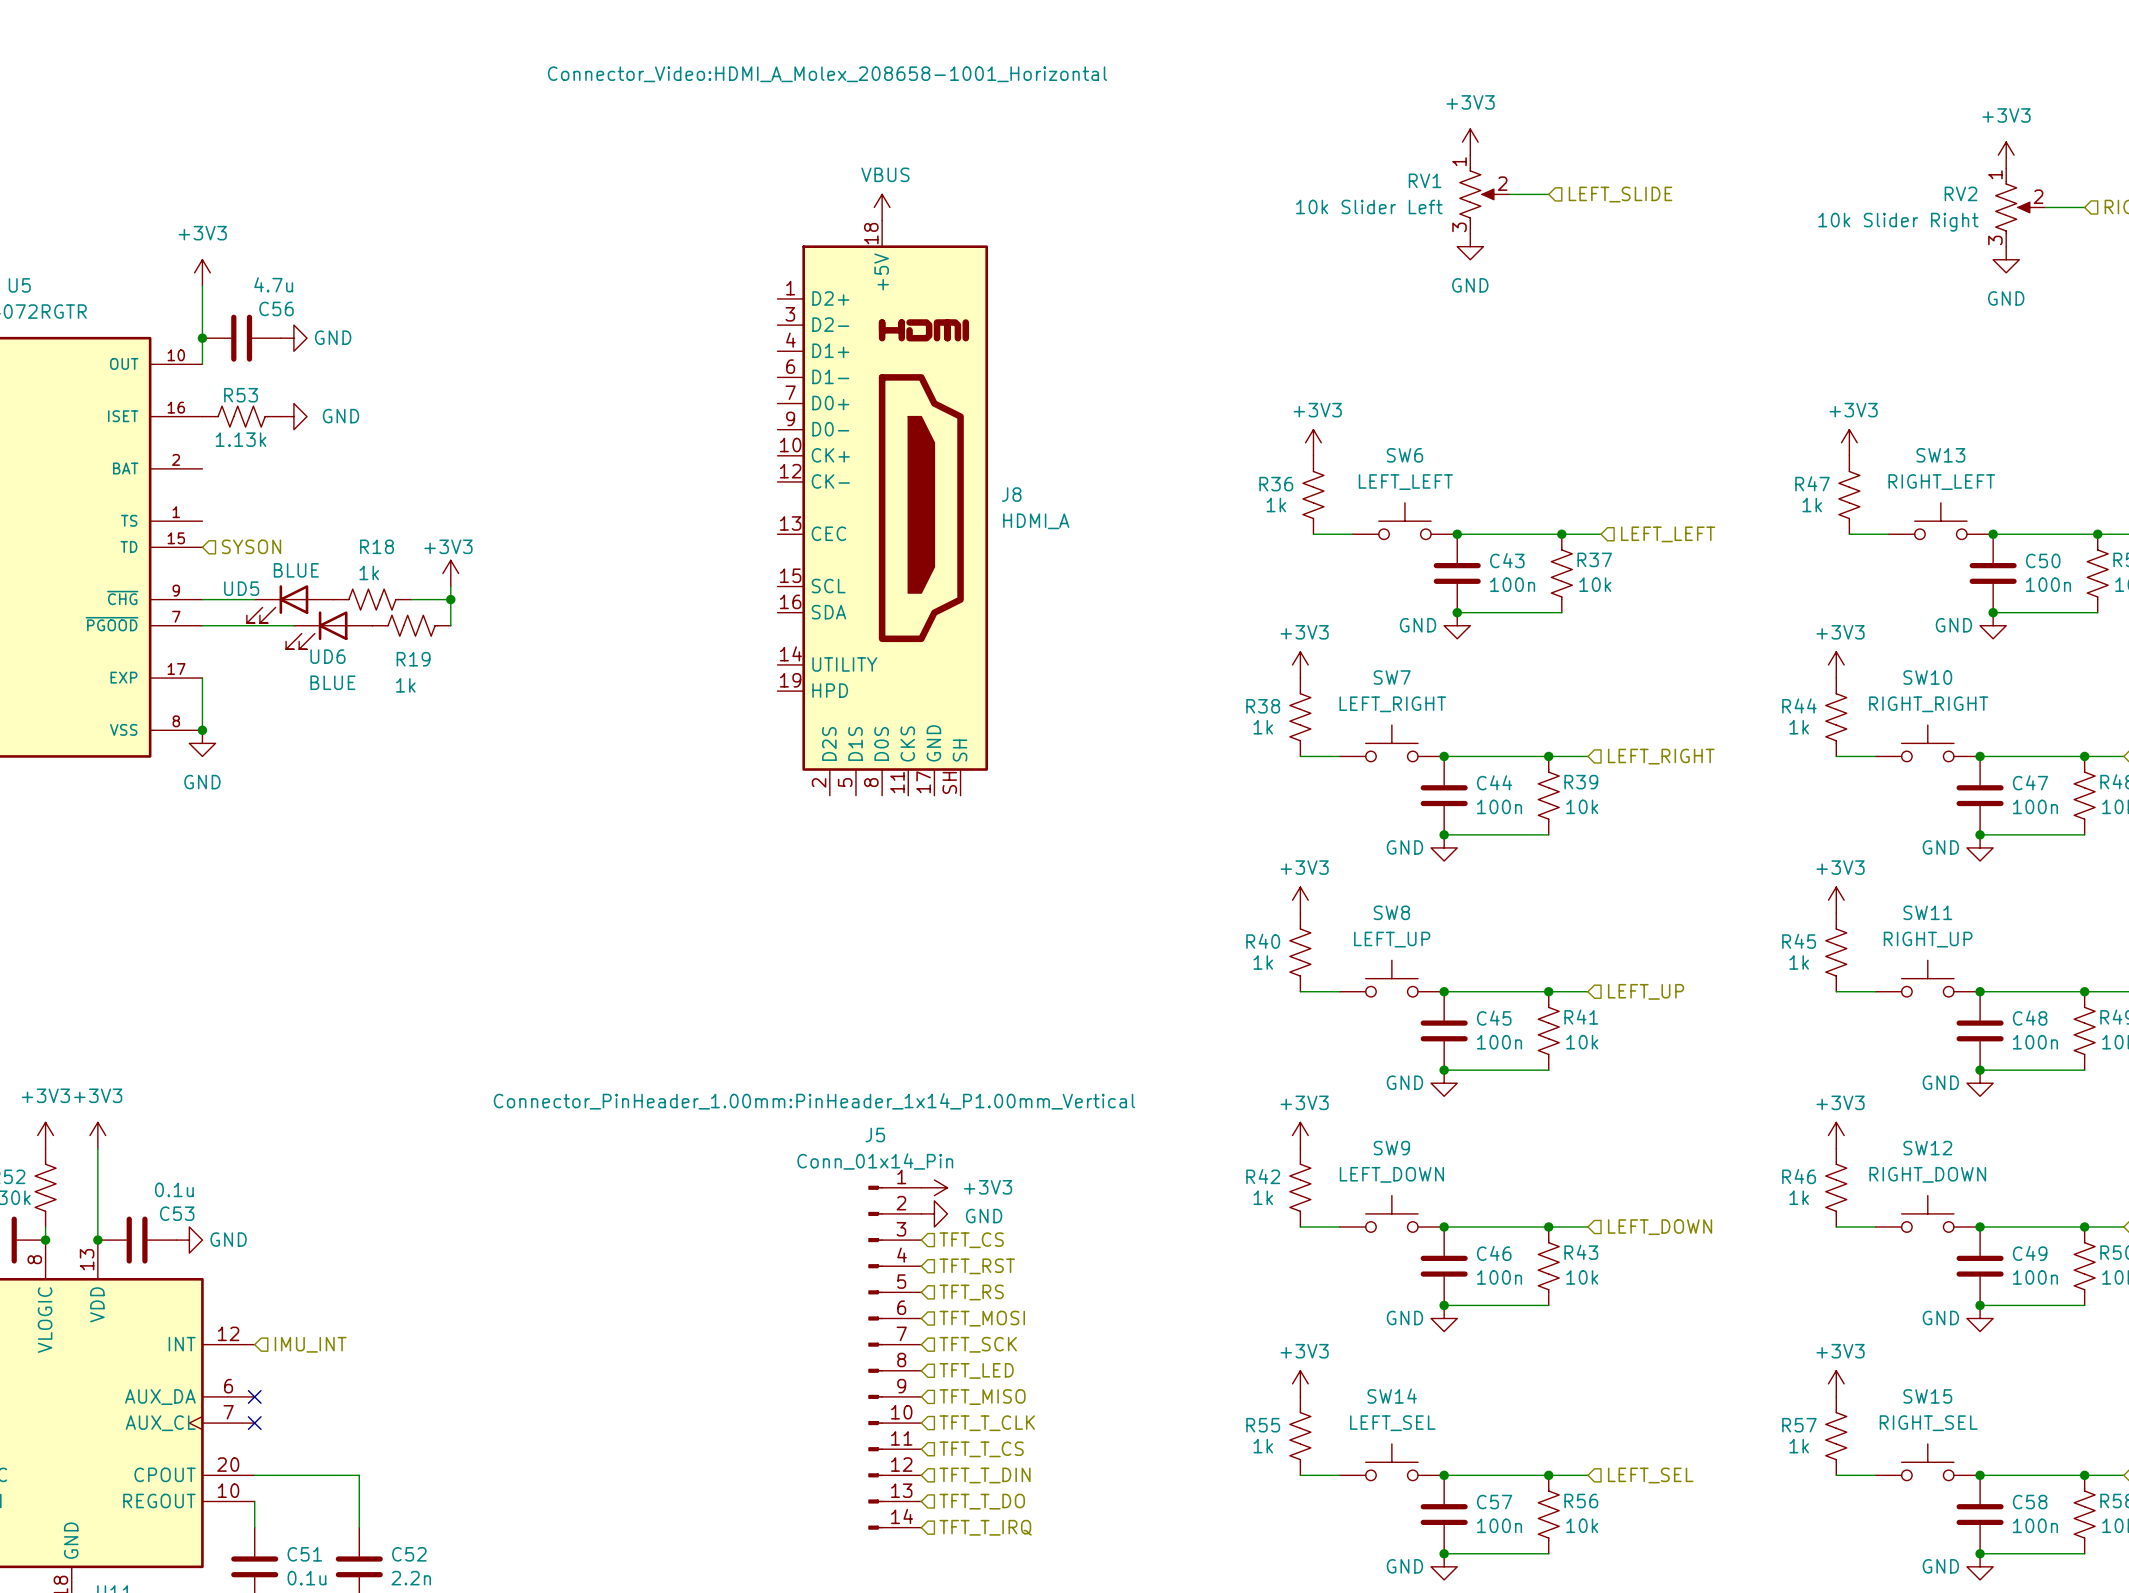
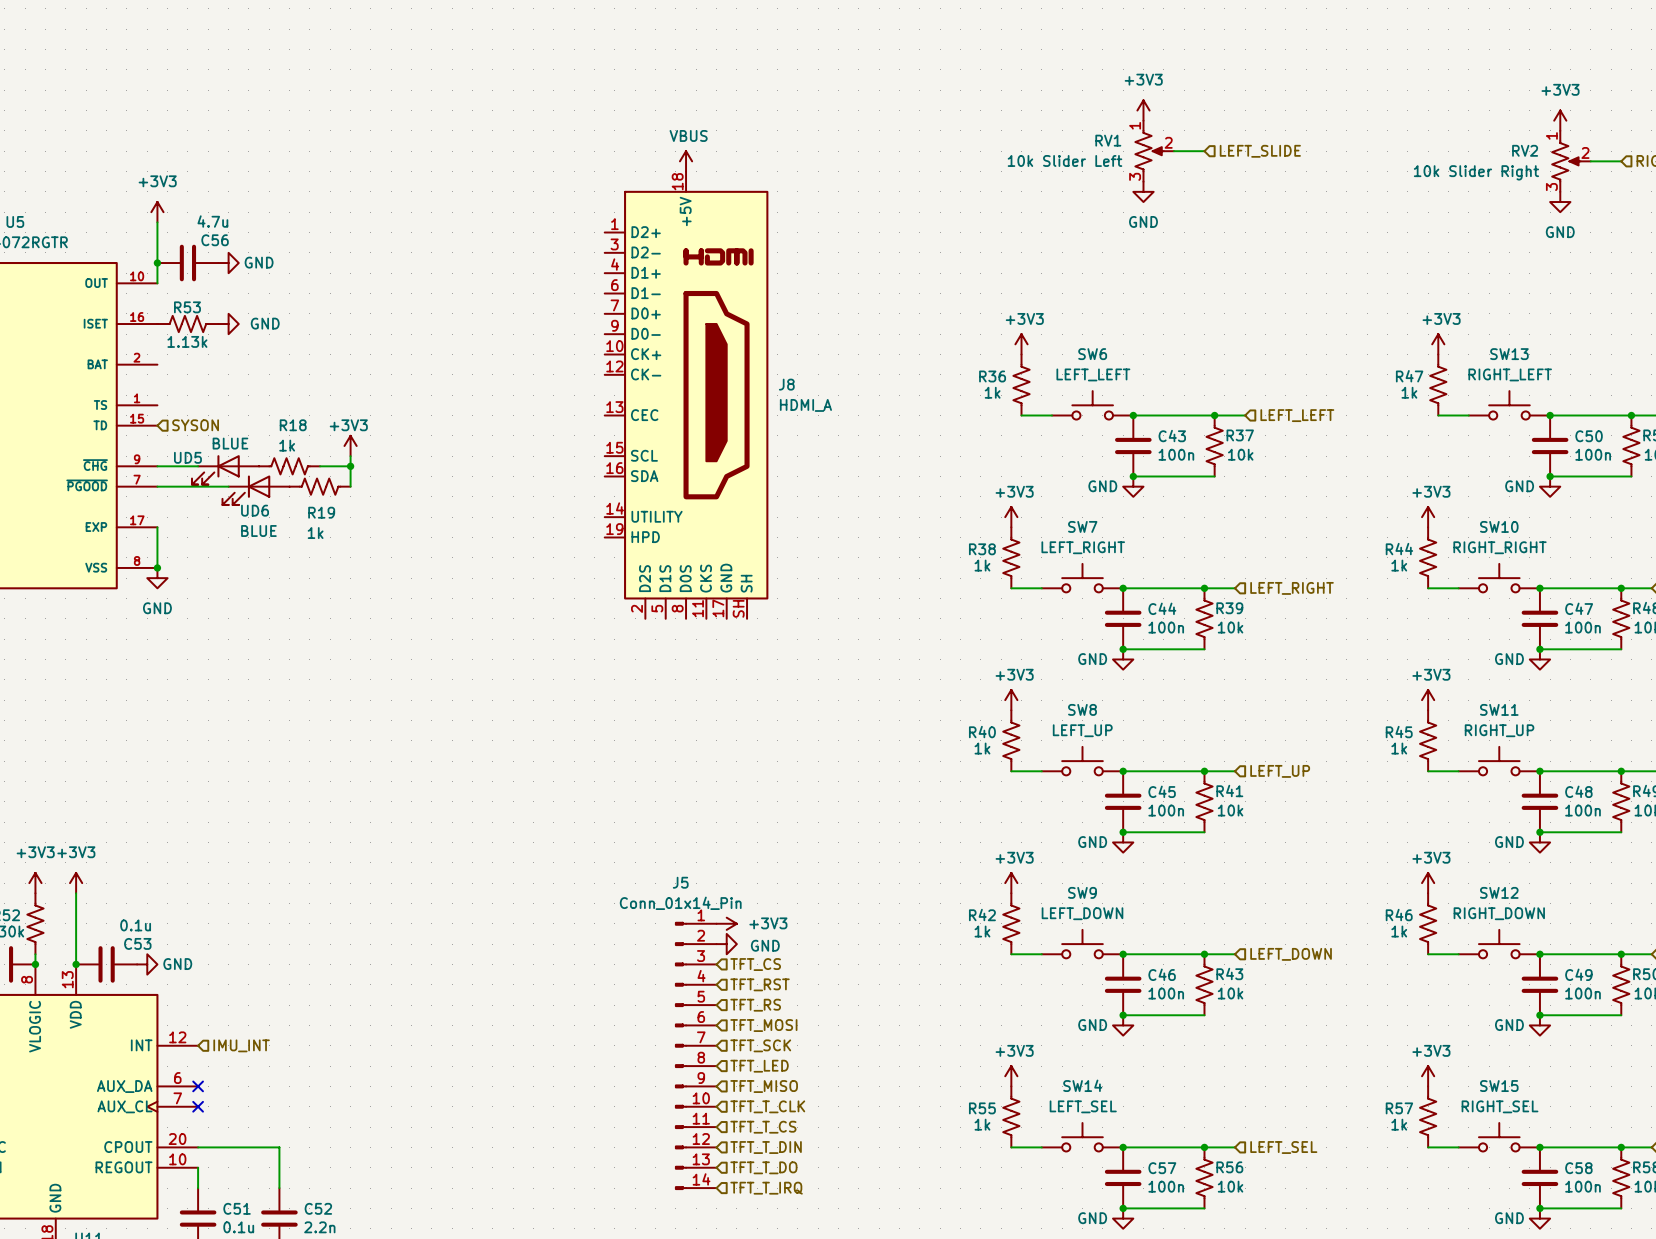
J8 text: Connector_Video:HDMI_A_Molex_208658-1001_Horizontal (827, 74) -> none
J5 text: Connector_PinHeader_1.00mm:PinHeader_1x14_P1.00mm_Vertical (814, 1101) -> none

